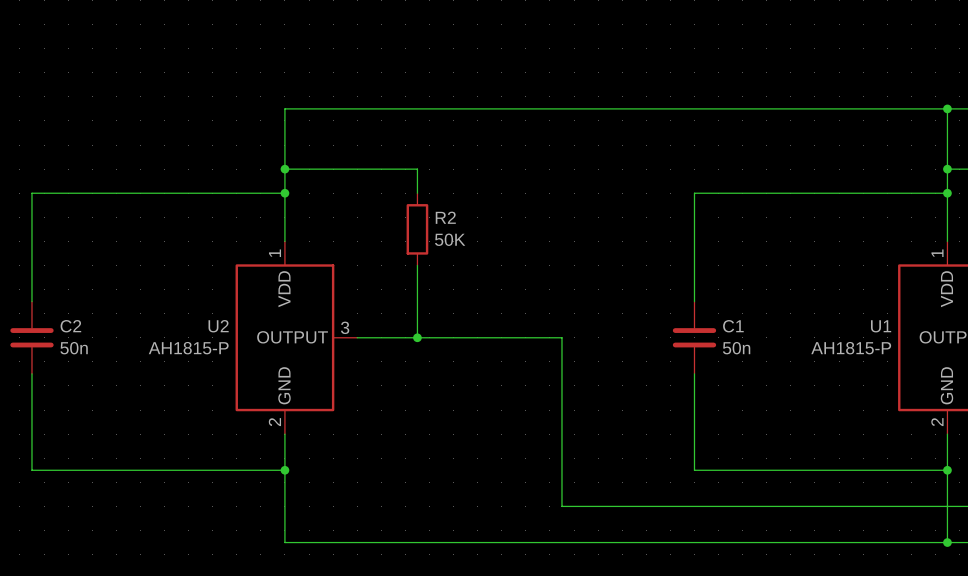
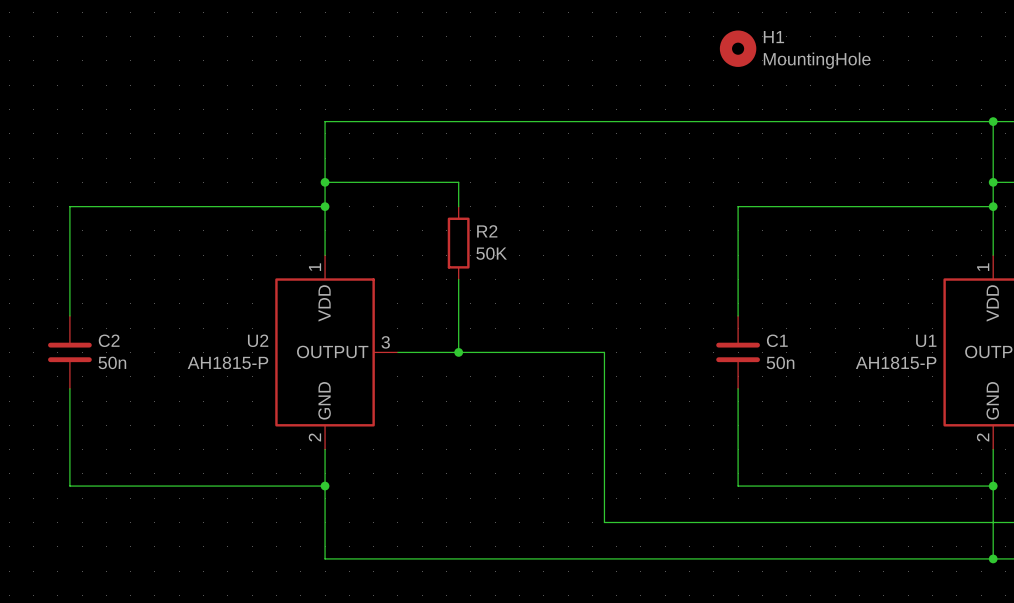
H1: none -> MountingHole (738, 48)

